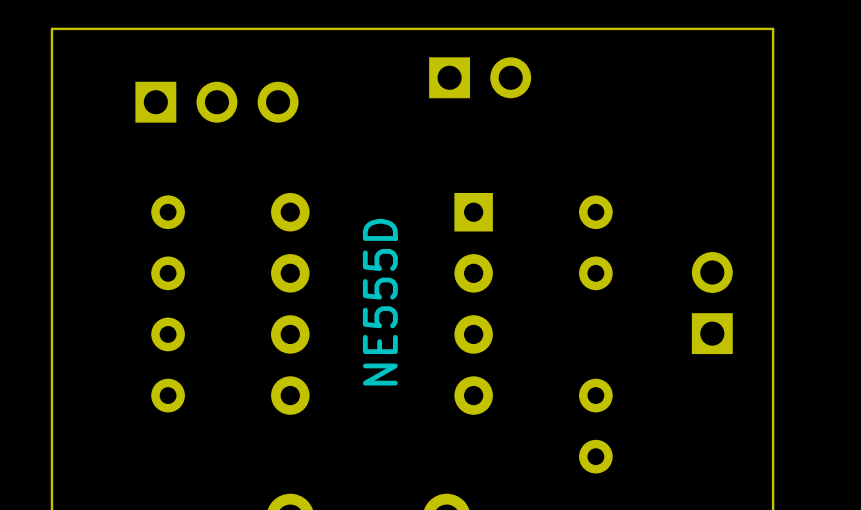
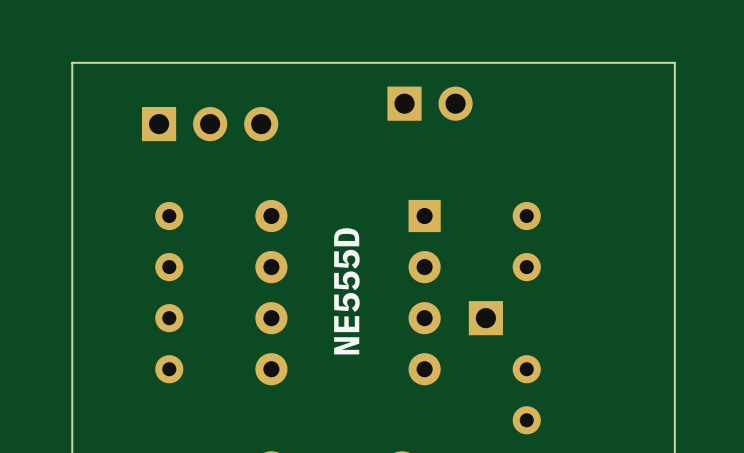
part: (712, 303) -> none
part: none -> (485, 318)

